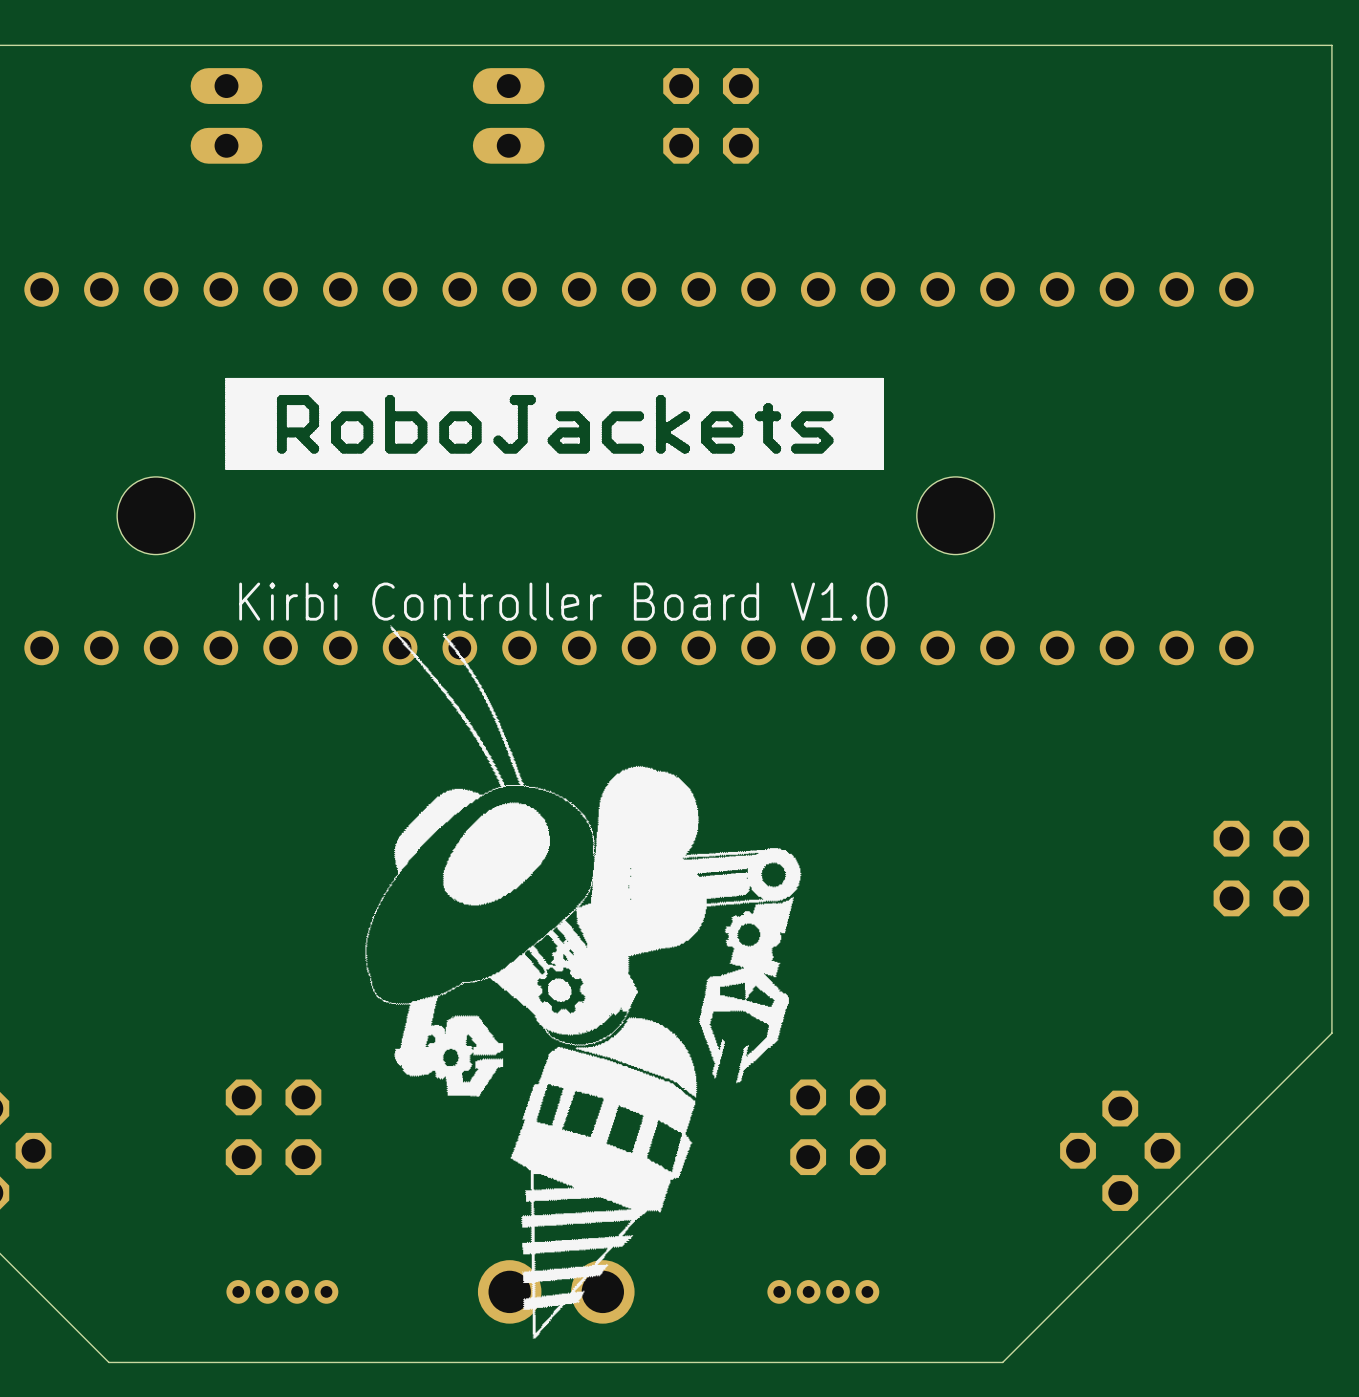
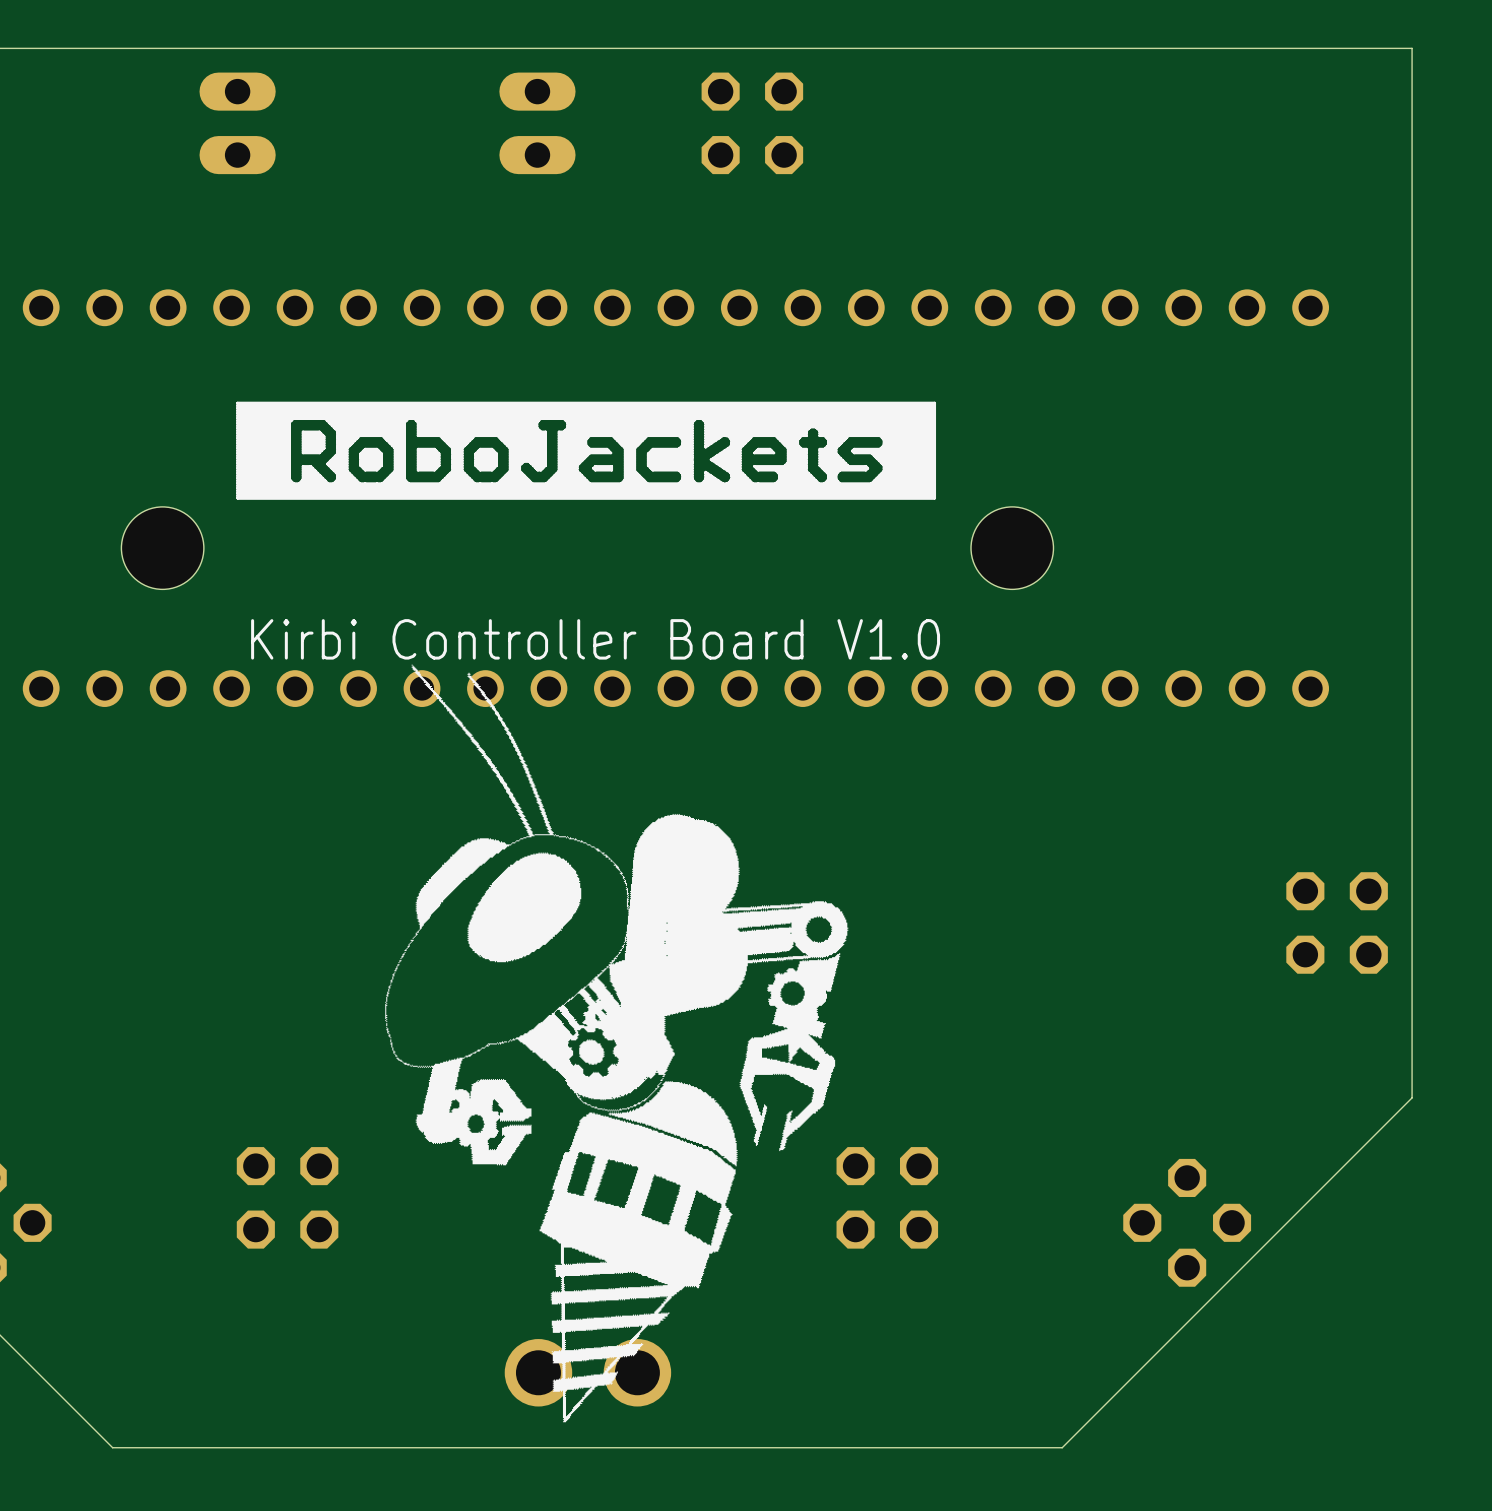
part: (282, 1291) -> none
part: (823, 1291) -> none

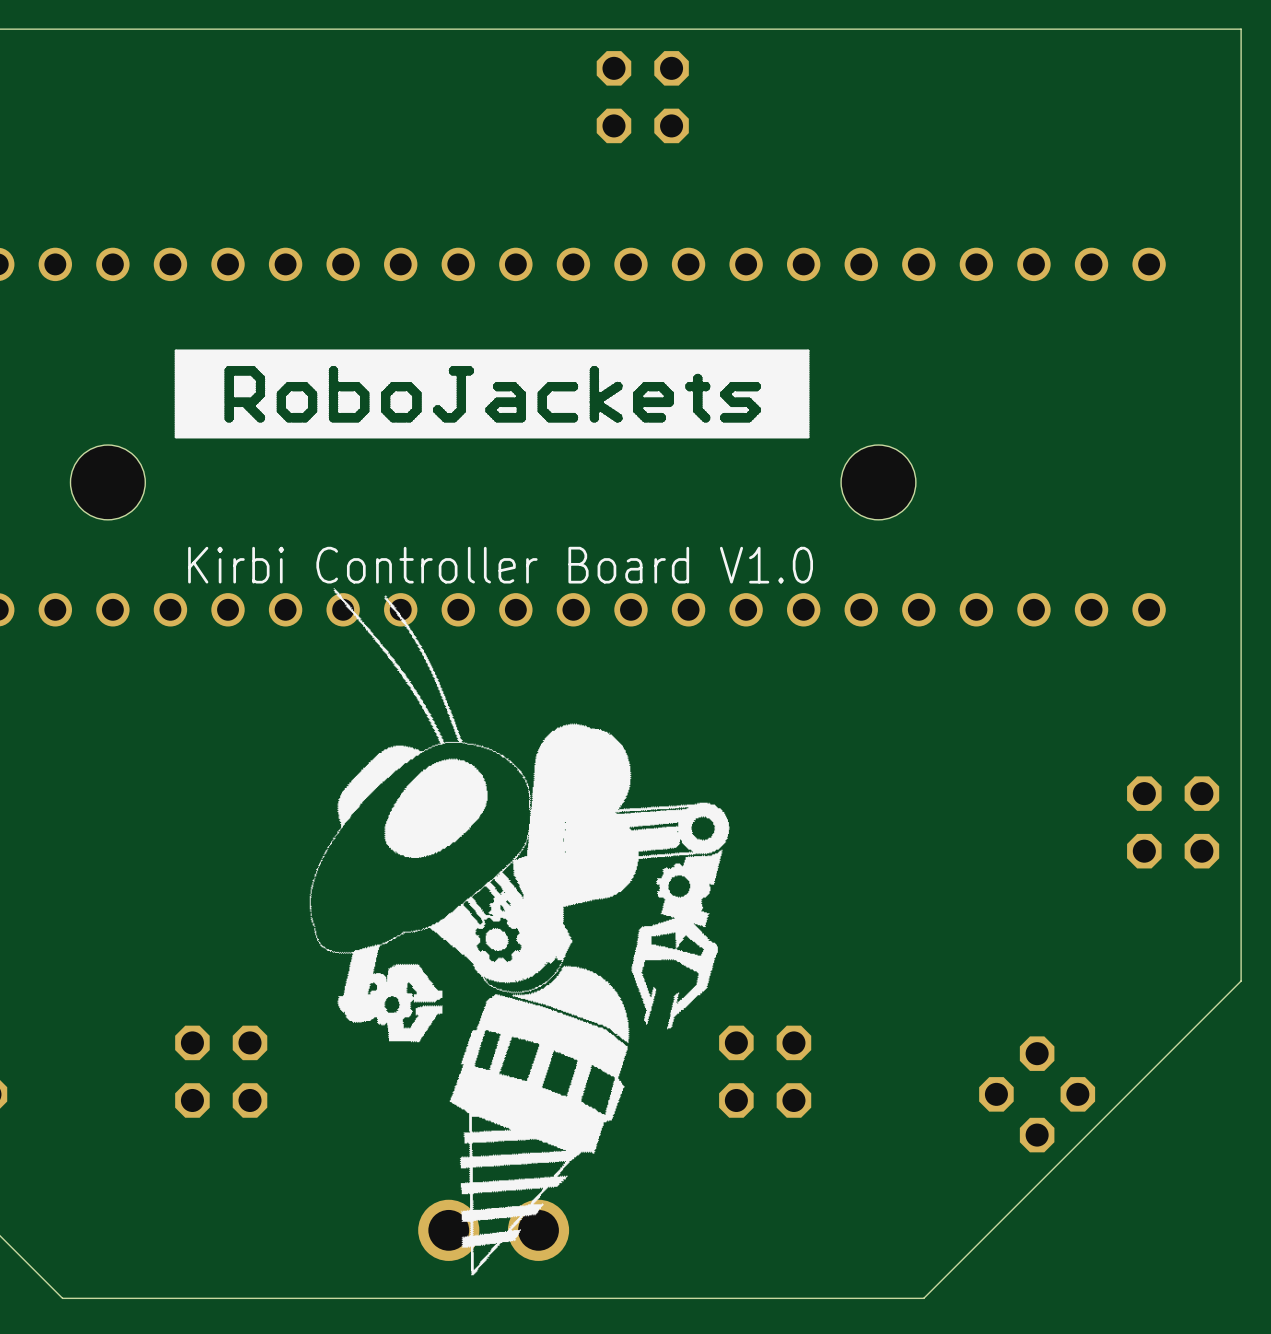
part: (237, 123) -> none
part: (537, 123) -> none

